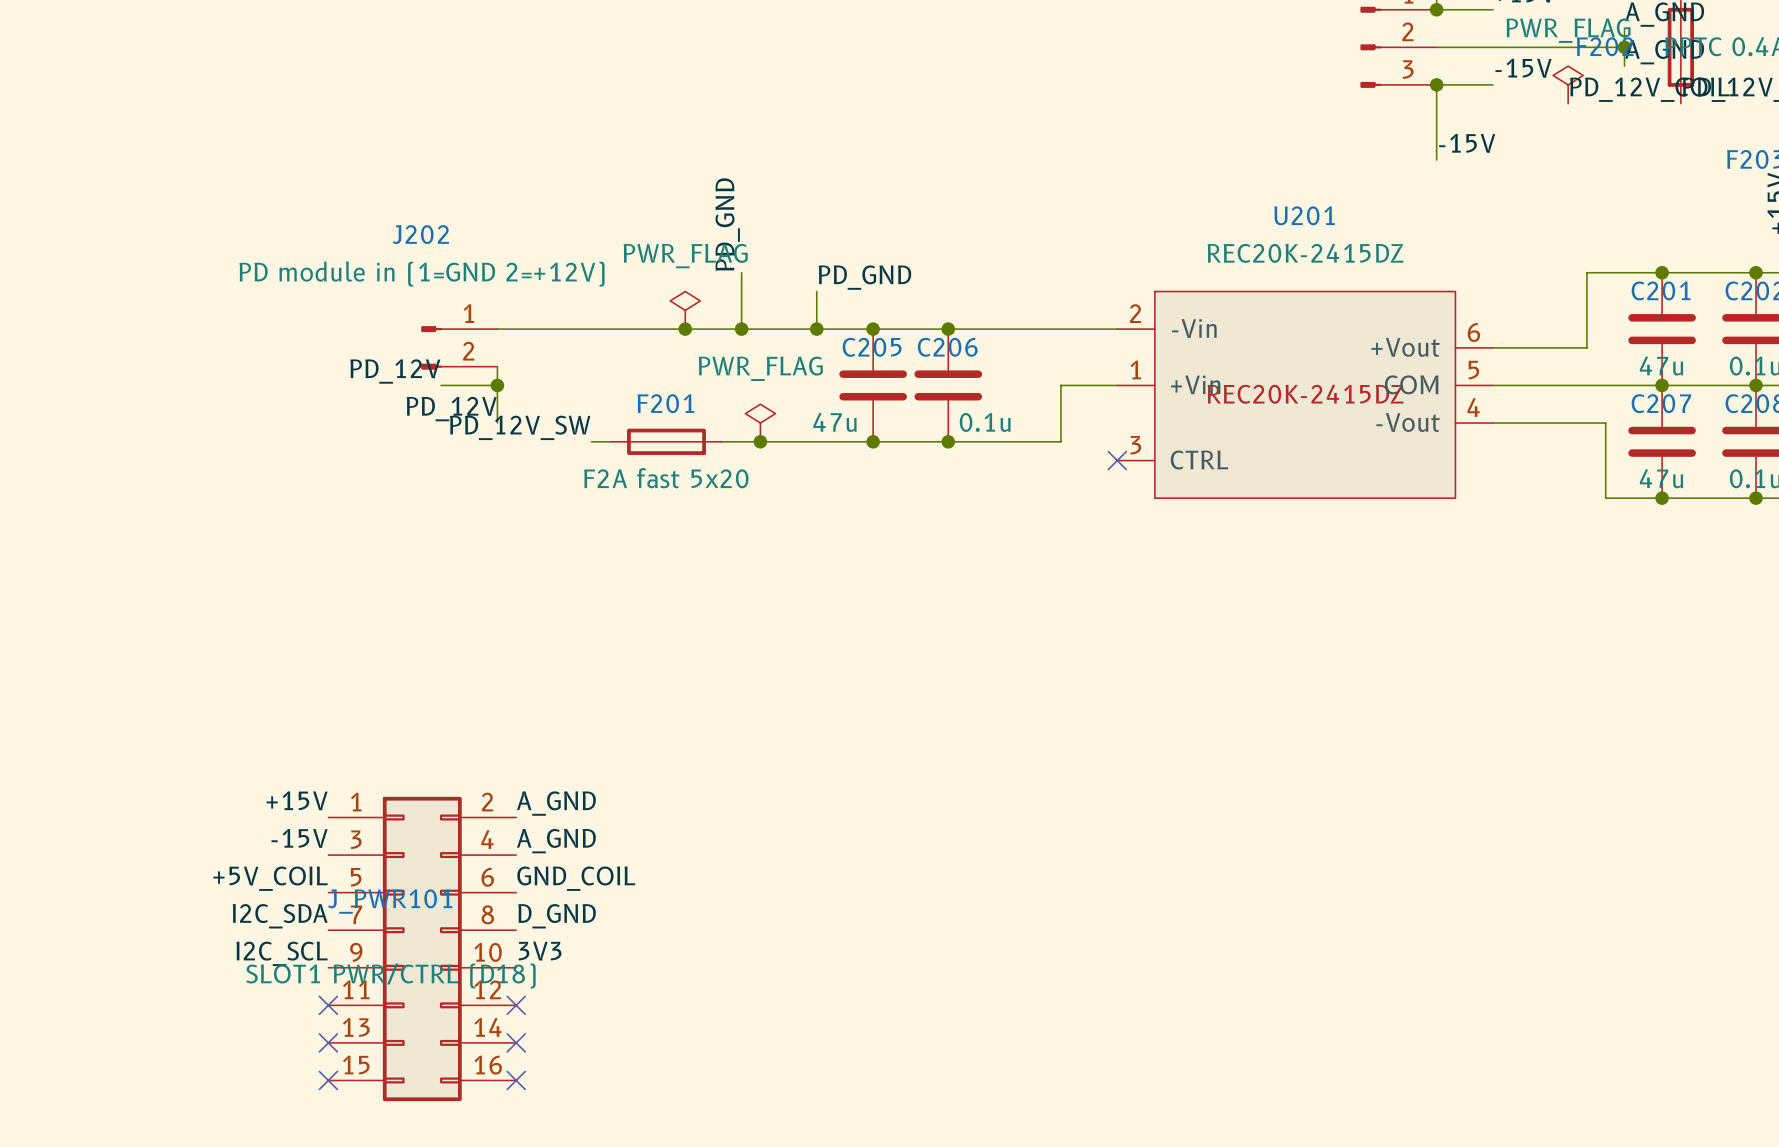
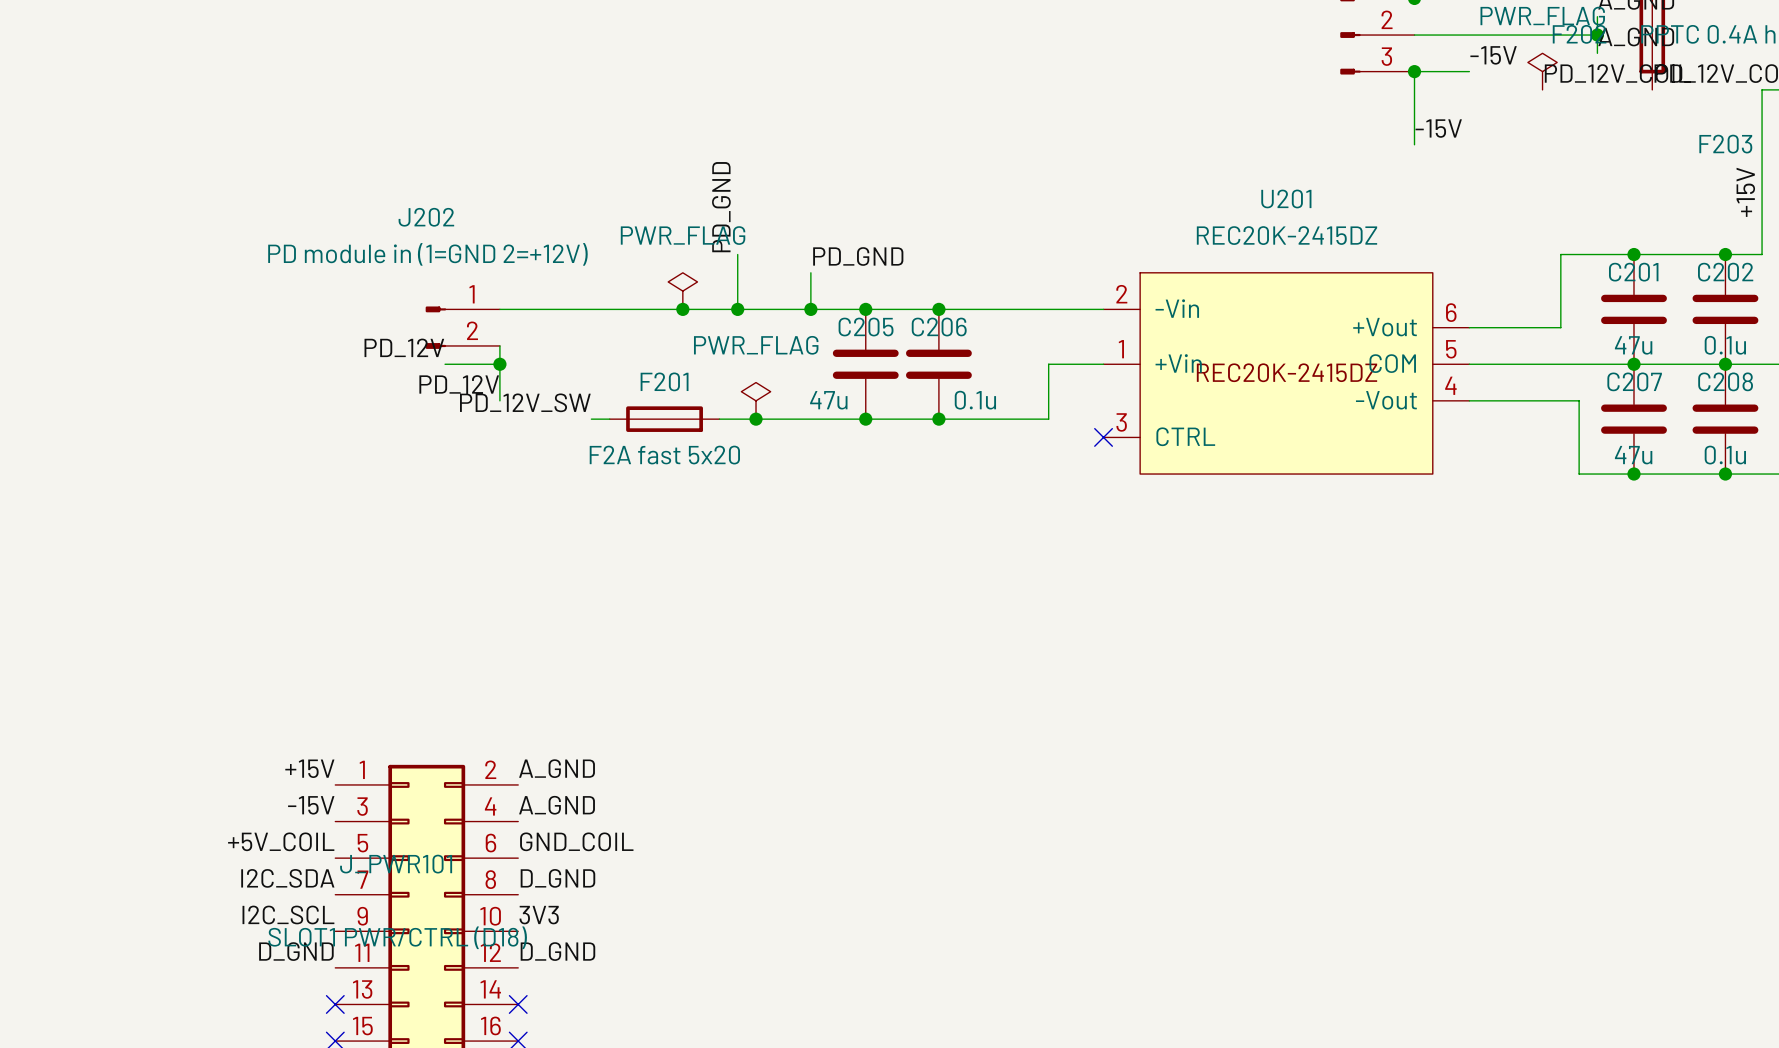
label: none -> D_GND (296, 951)
label: none -> D_GND (557, 951)
no-connect mark: (328, 1005) -> none
no-connect mark: (516, 1005) -> none

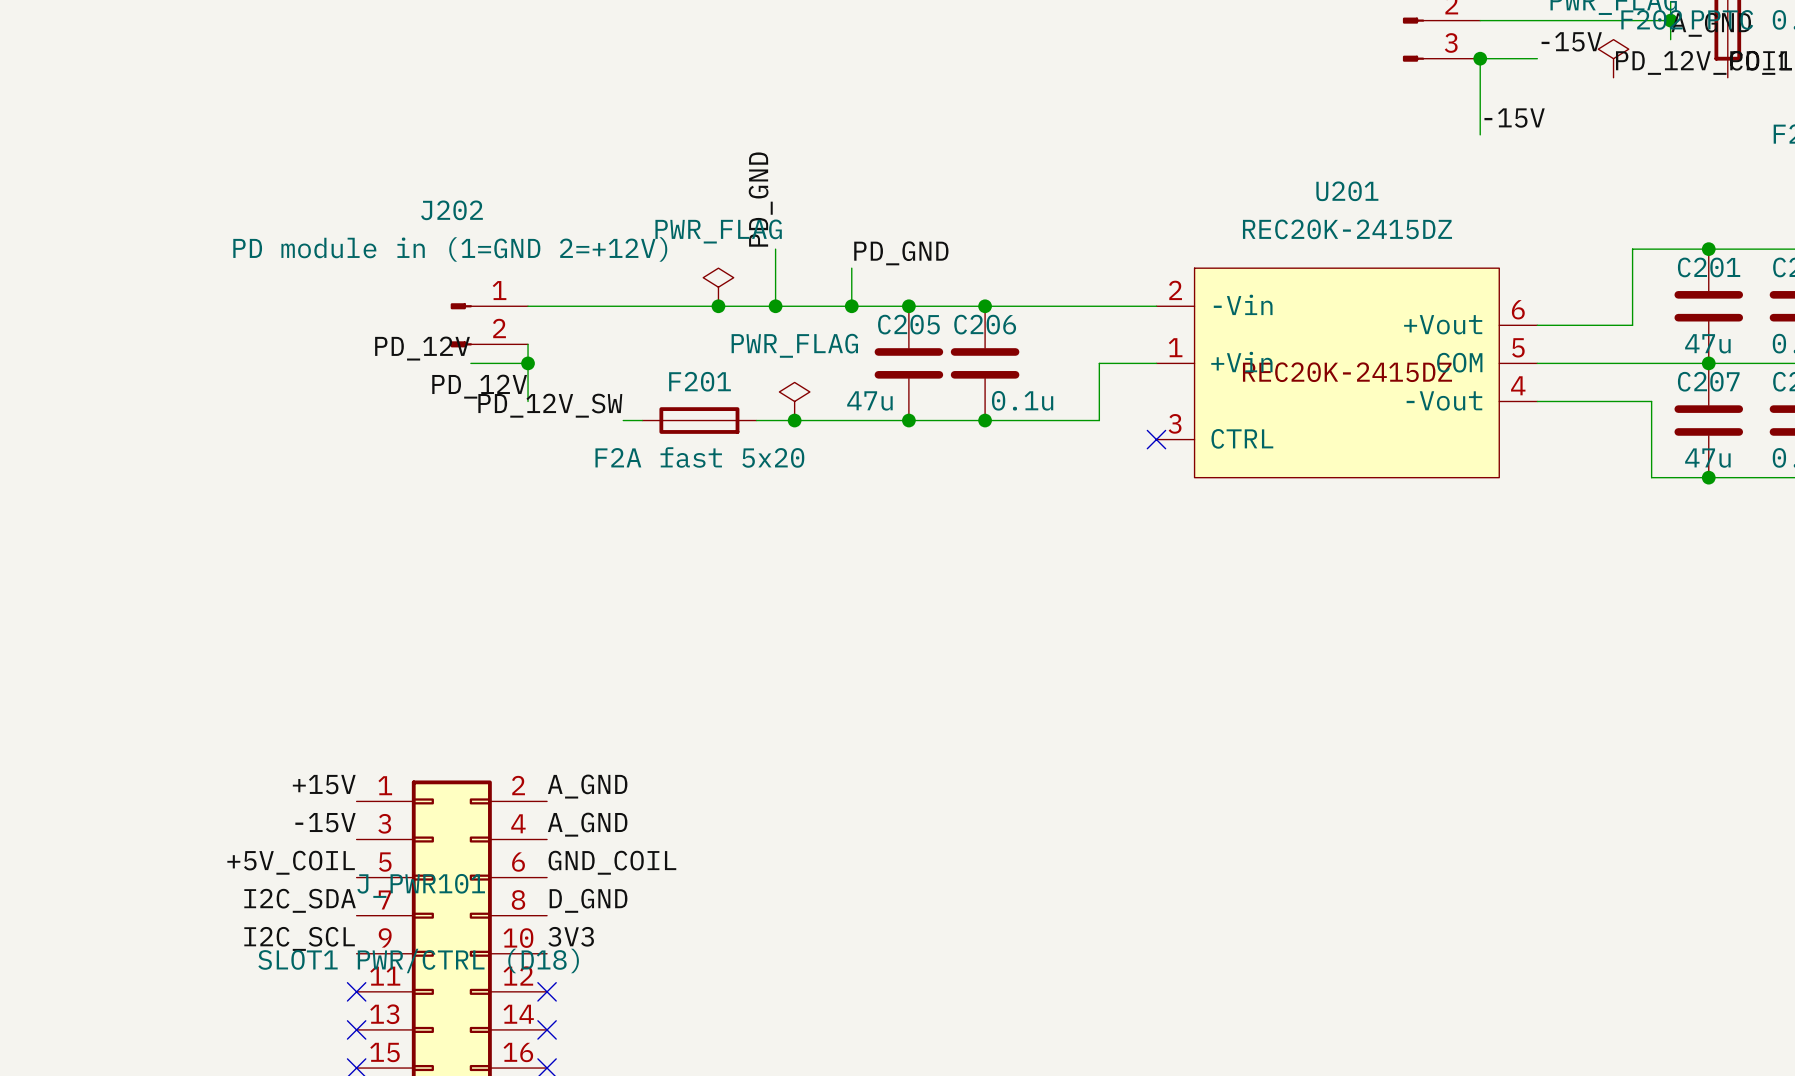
label: D_GND (296, 951) -> none
label: D_GND (557, 951) -> none
no-connect mark: none -> (356, 991)
no-connect mark: none -> (547, 991)

